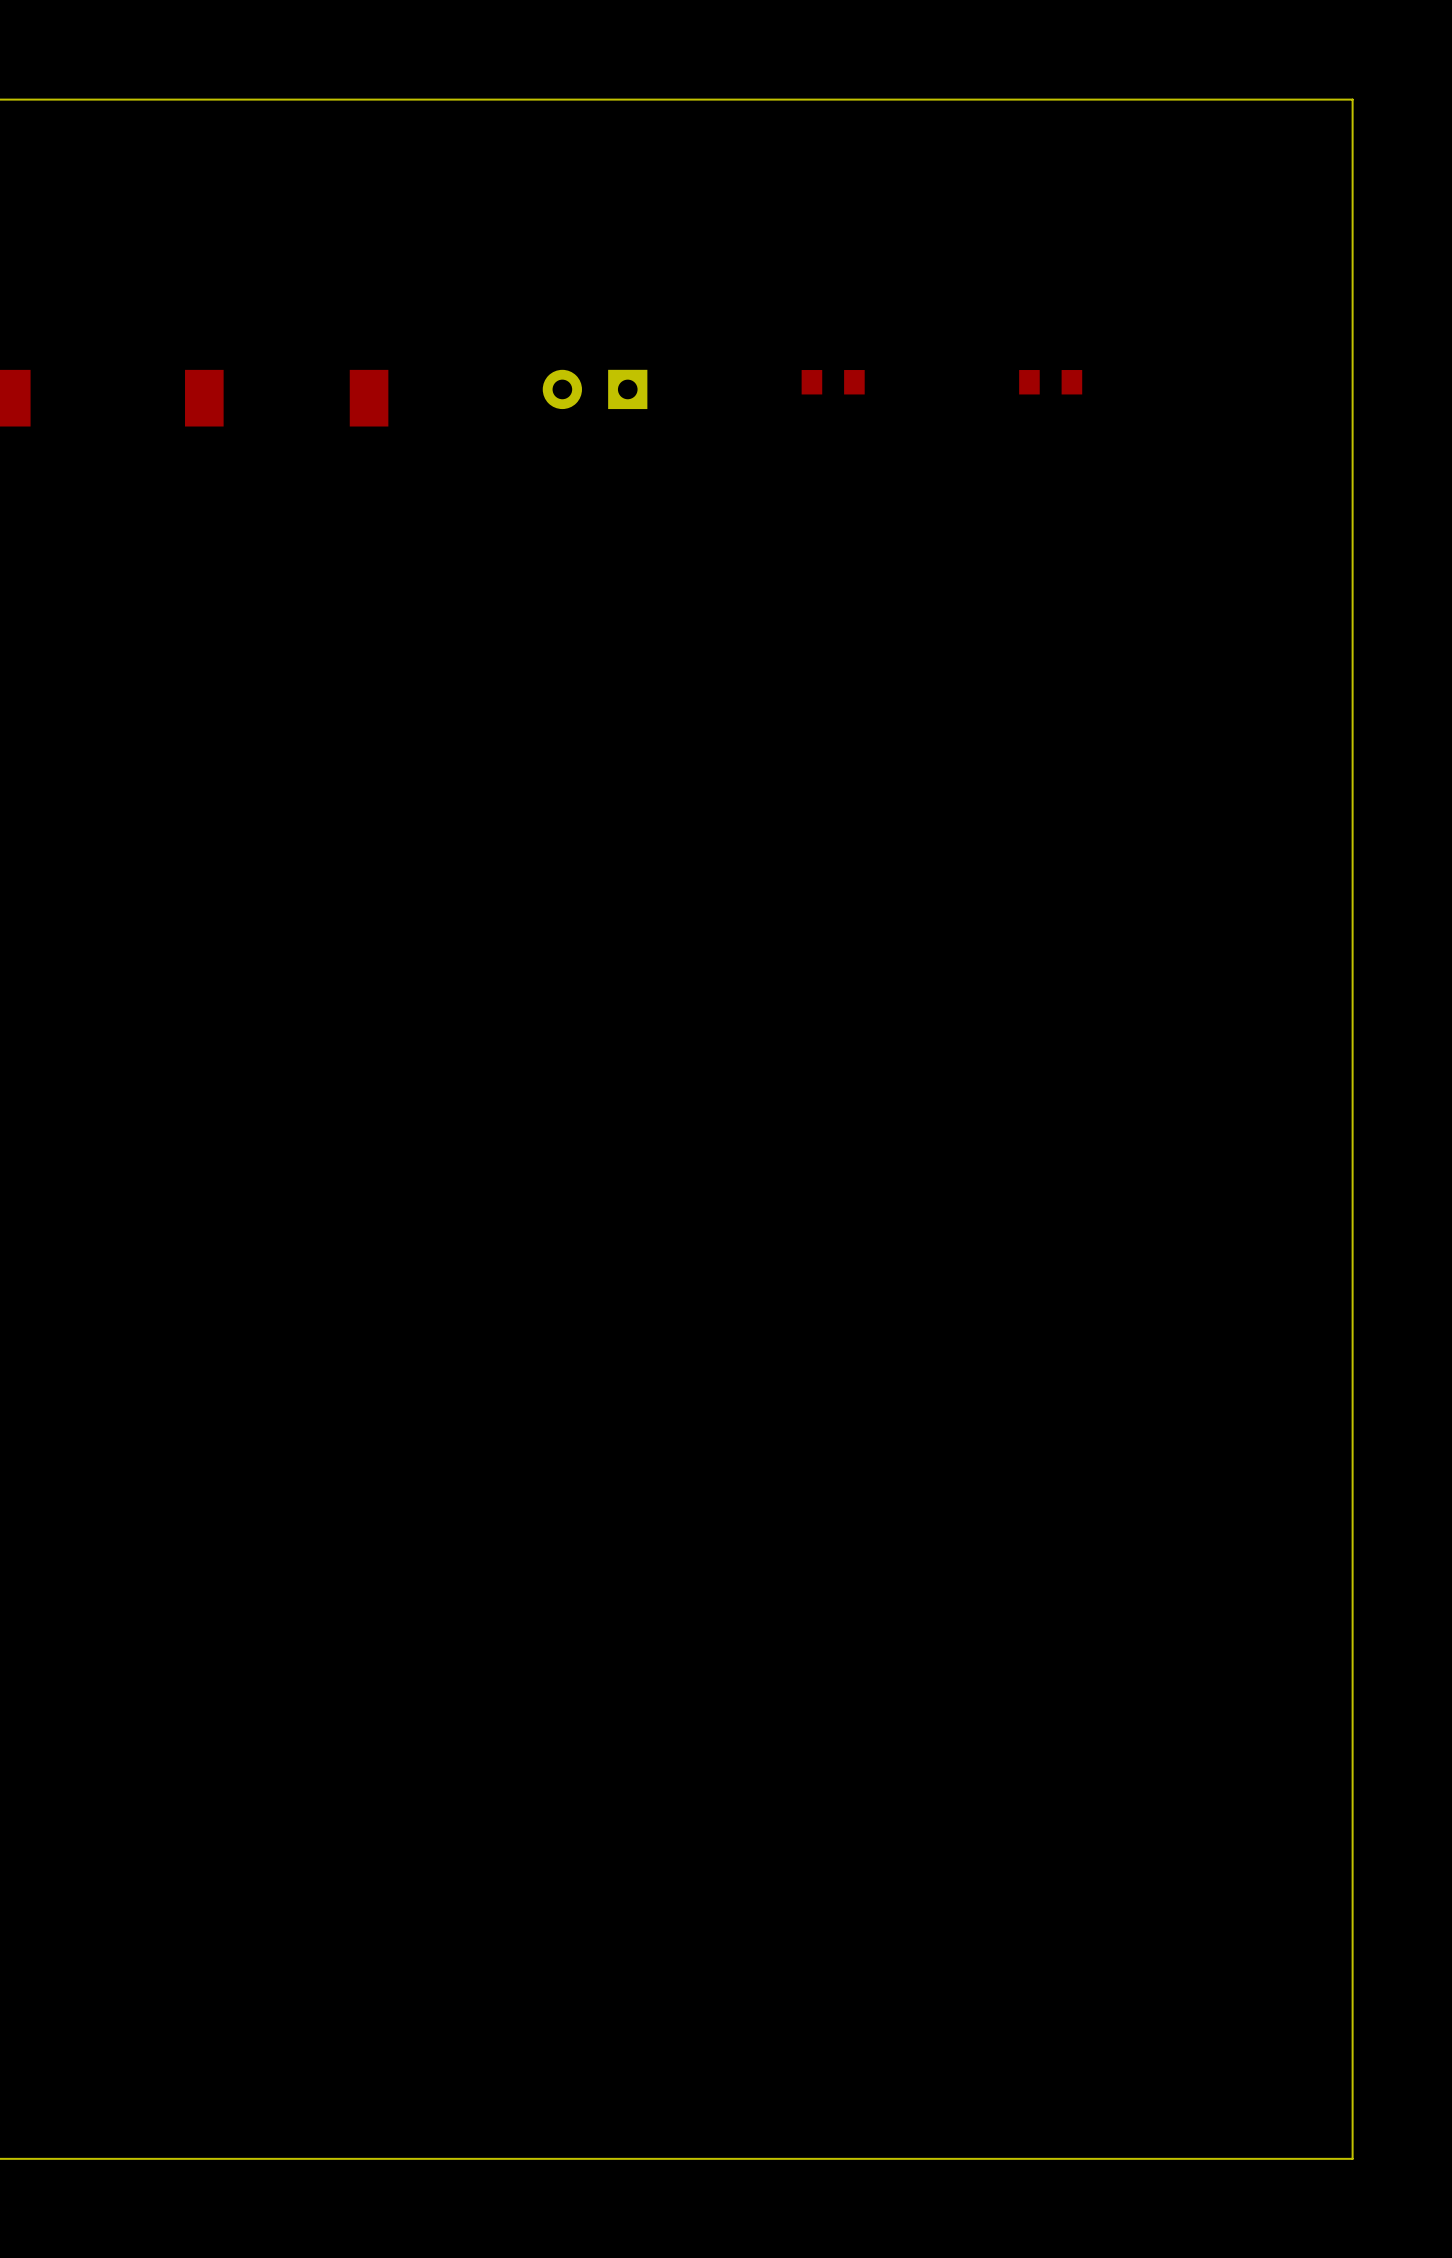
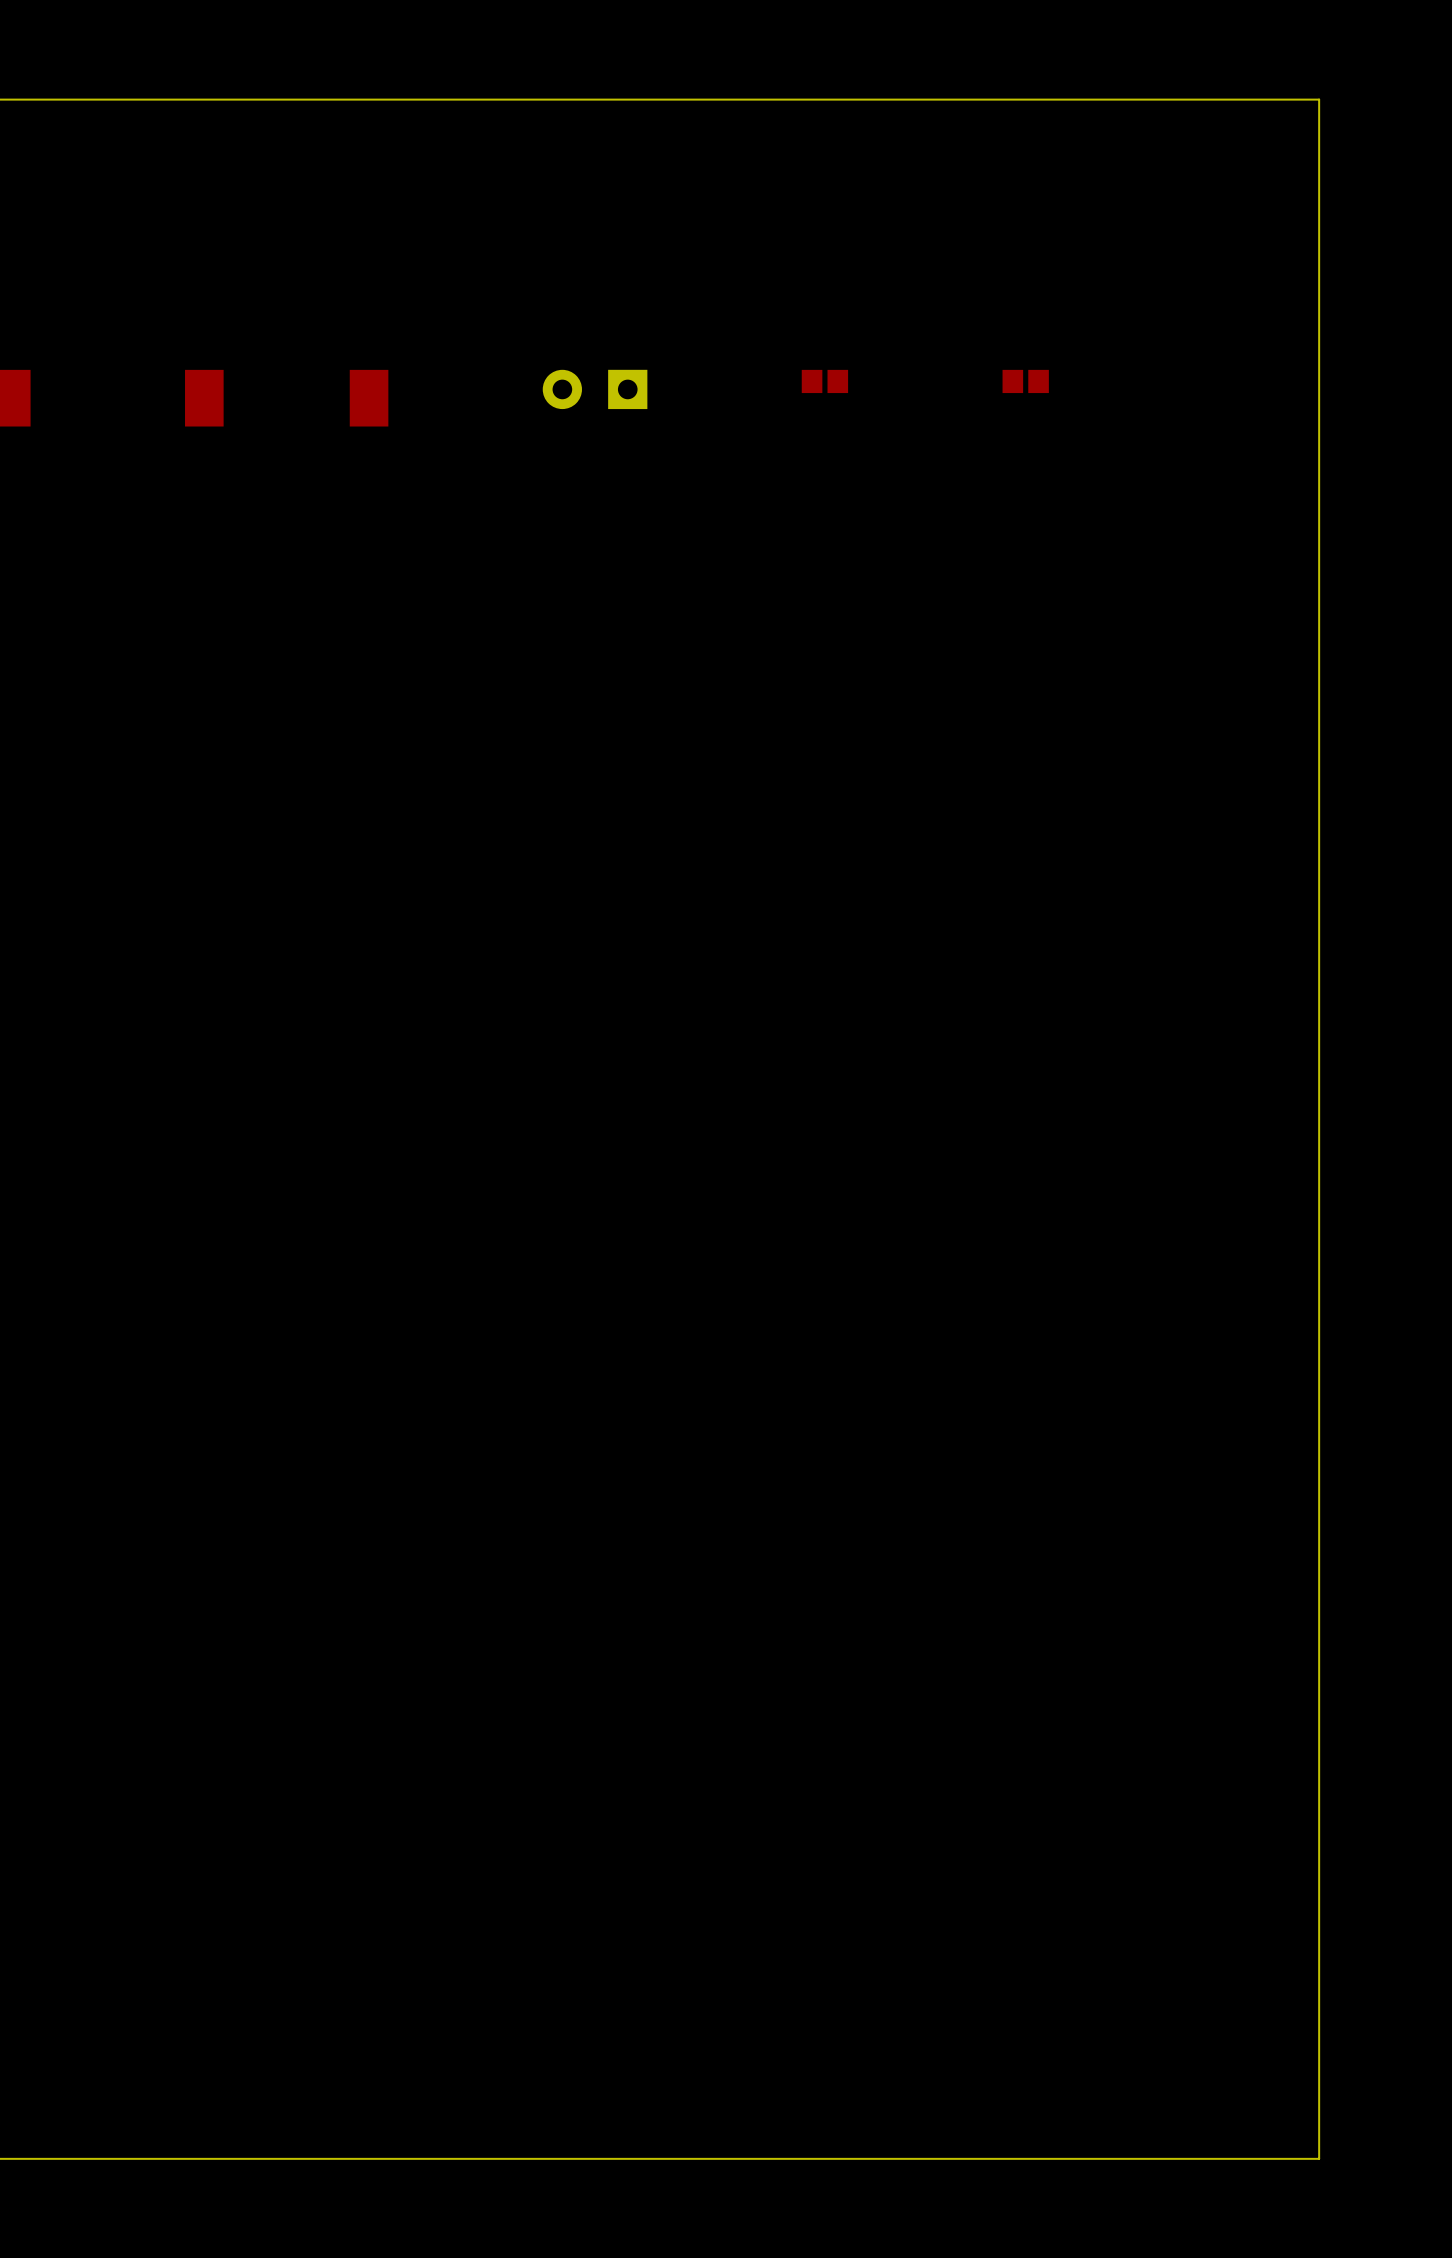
board edge: (1319, 99) (1352, 99) (1352, 2158) (1319, 2158) -> (1319, 99) (1319, 2158)
part footprint: [801, 370, 865, 395] -> [801, 369, 849, 394]
part footprint: [1019, 370, 1083, 395] -> [1002, 369, 1049, 394]

